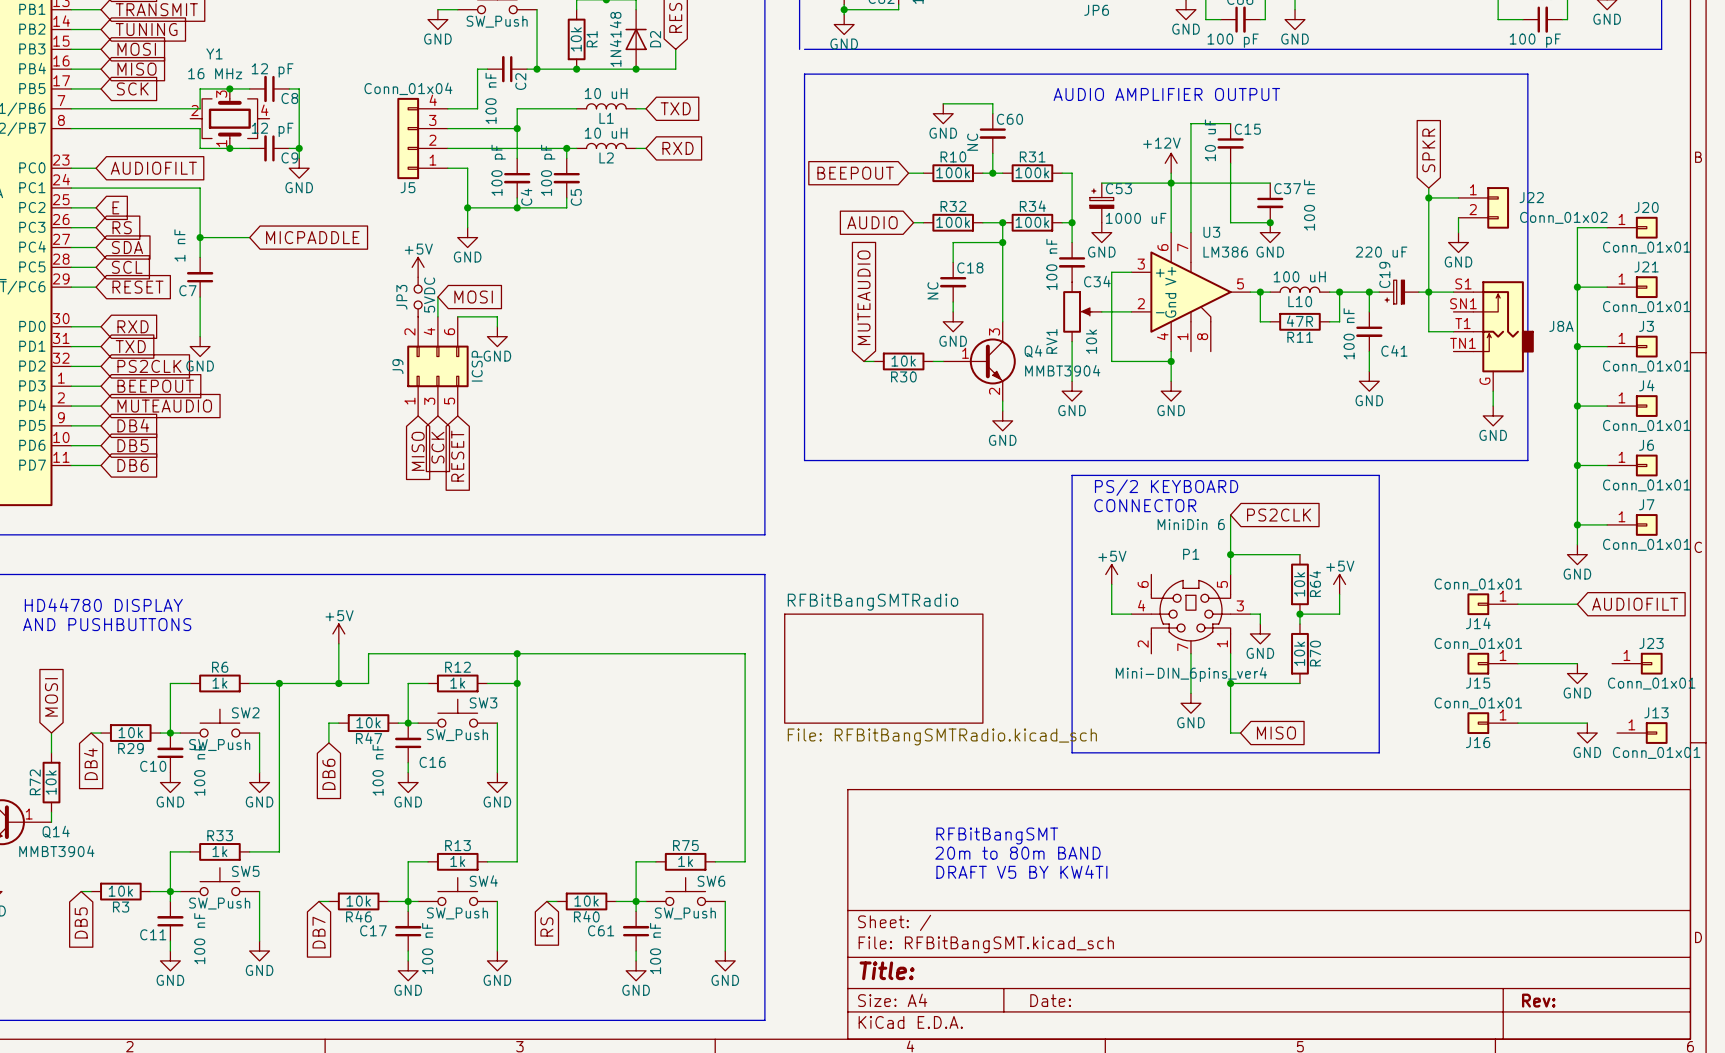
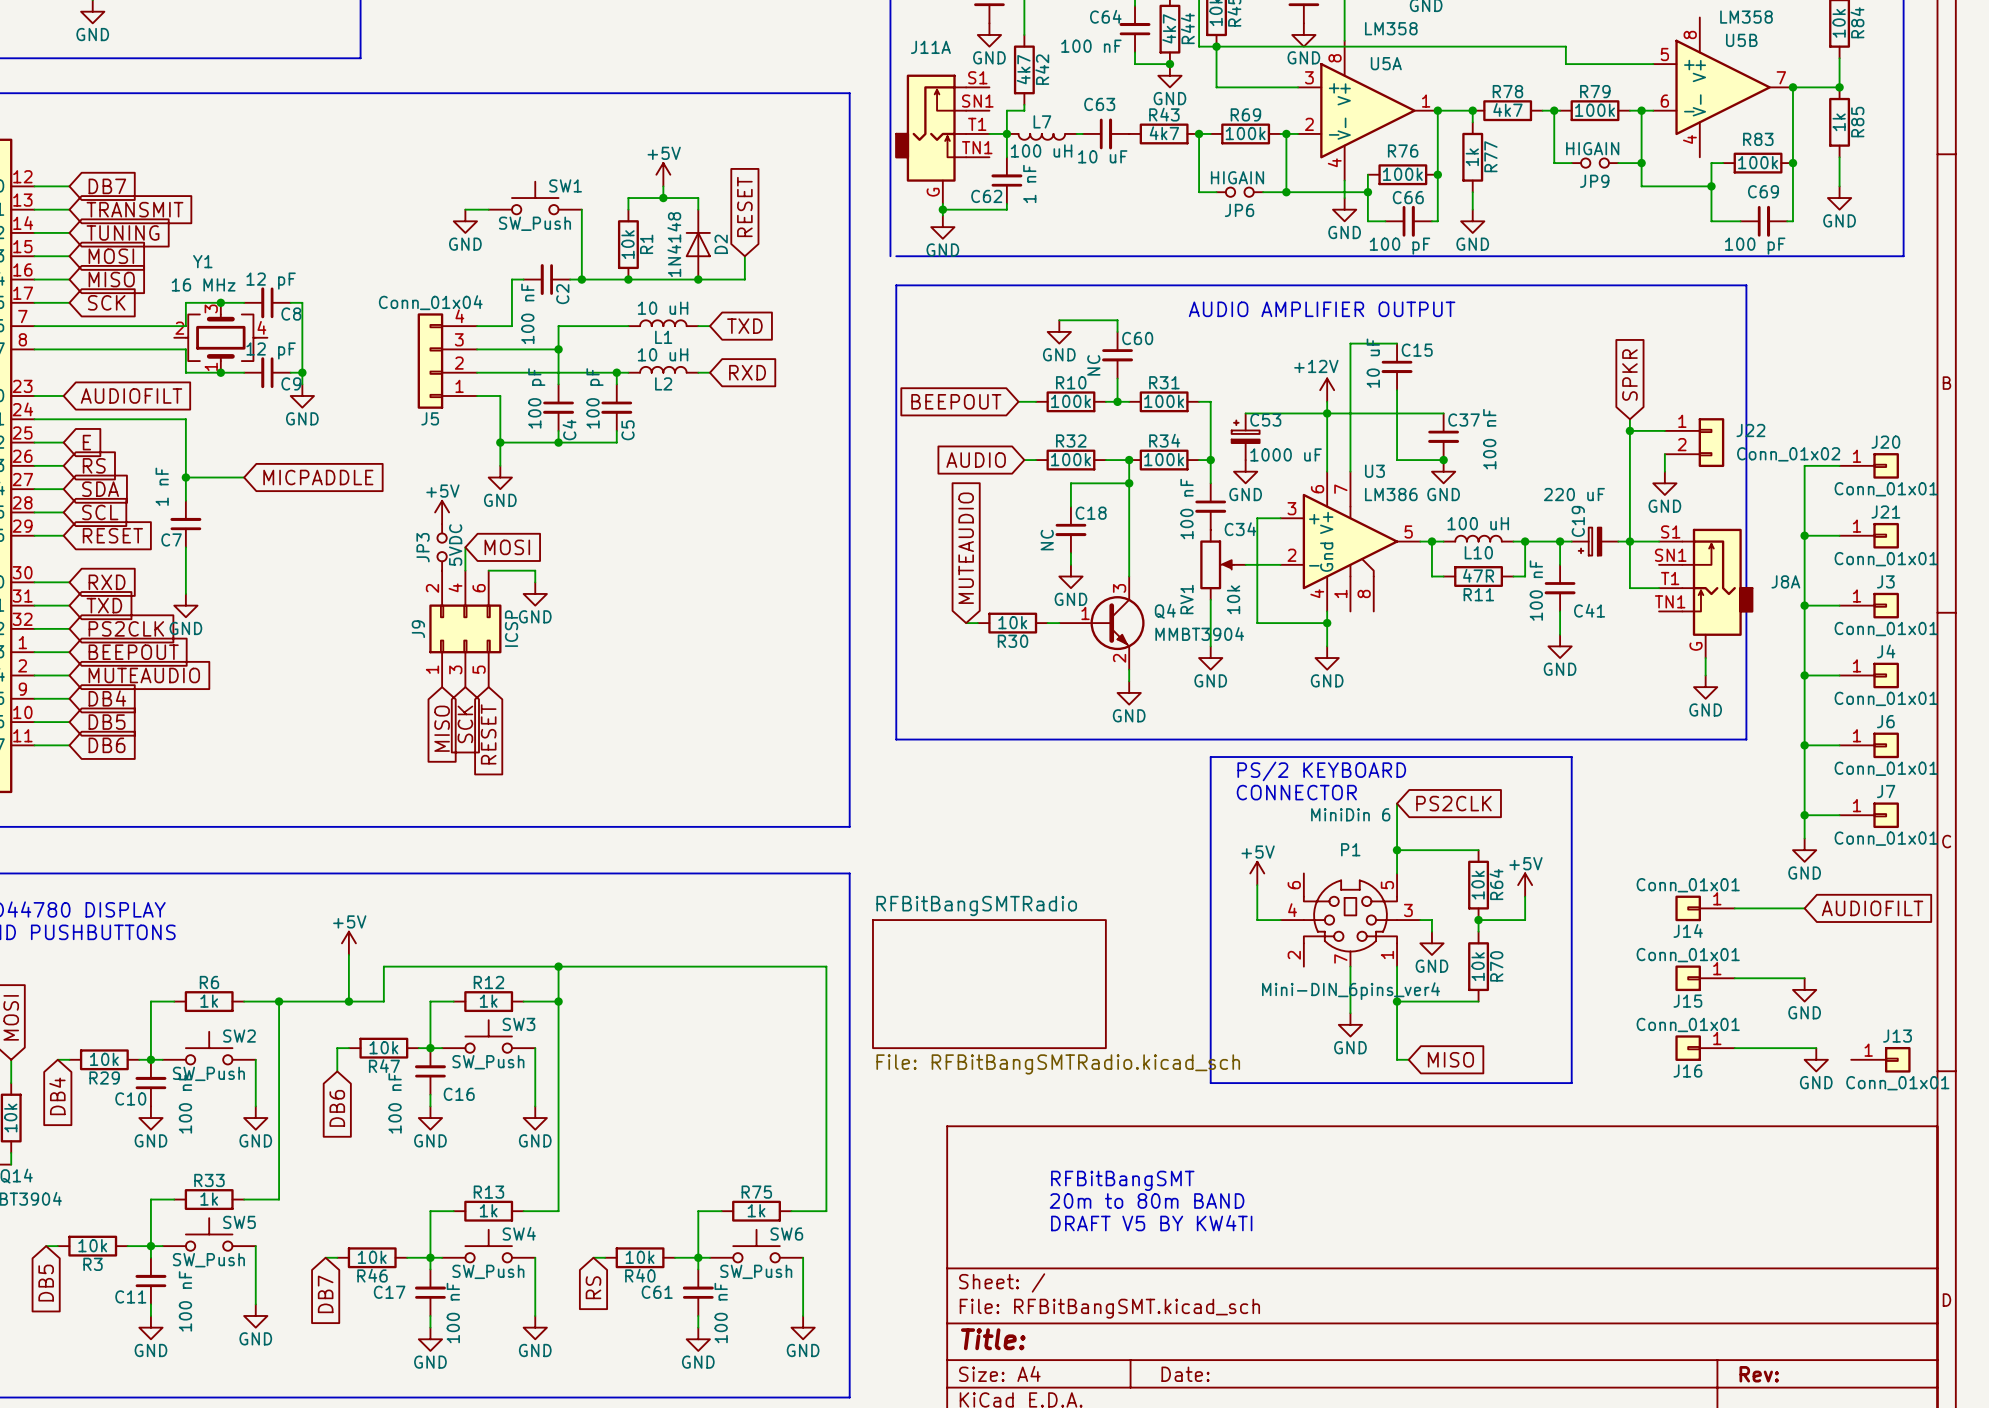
J23: Conn_01x01 (1637, 663) -> none

